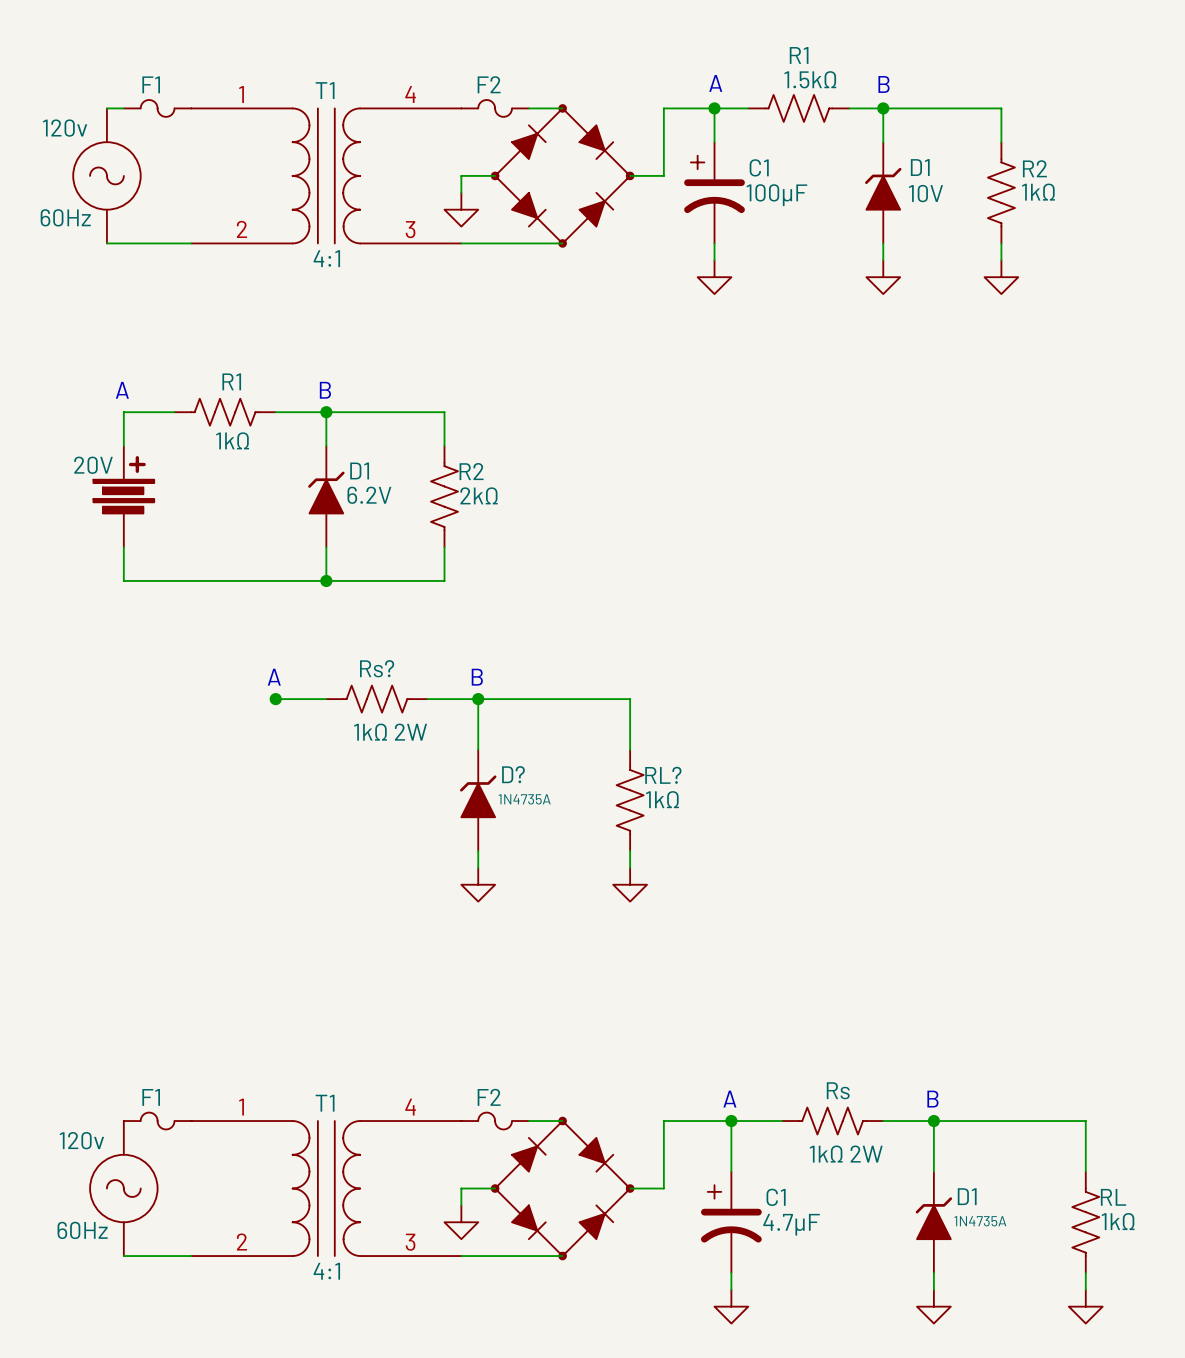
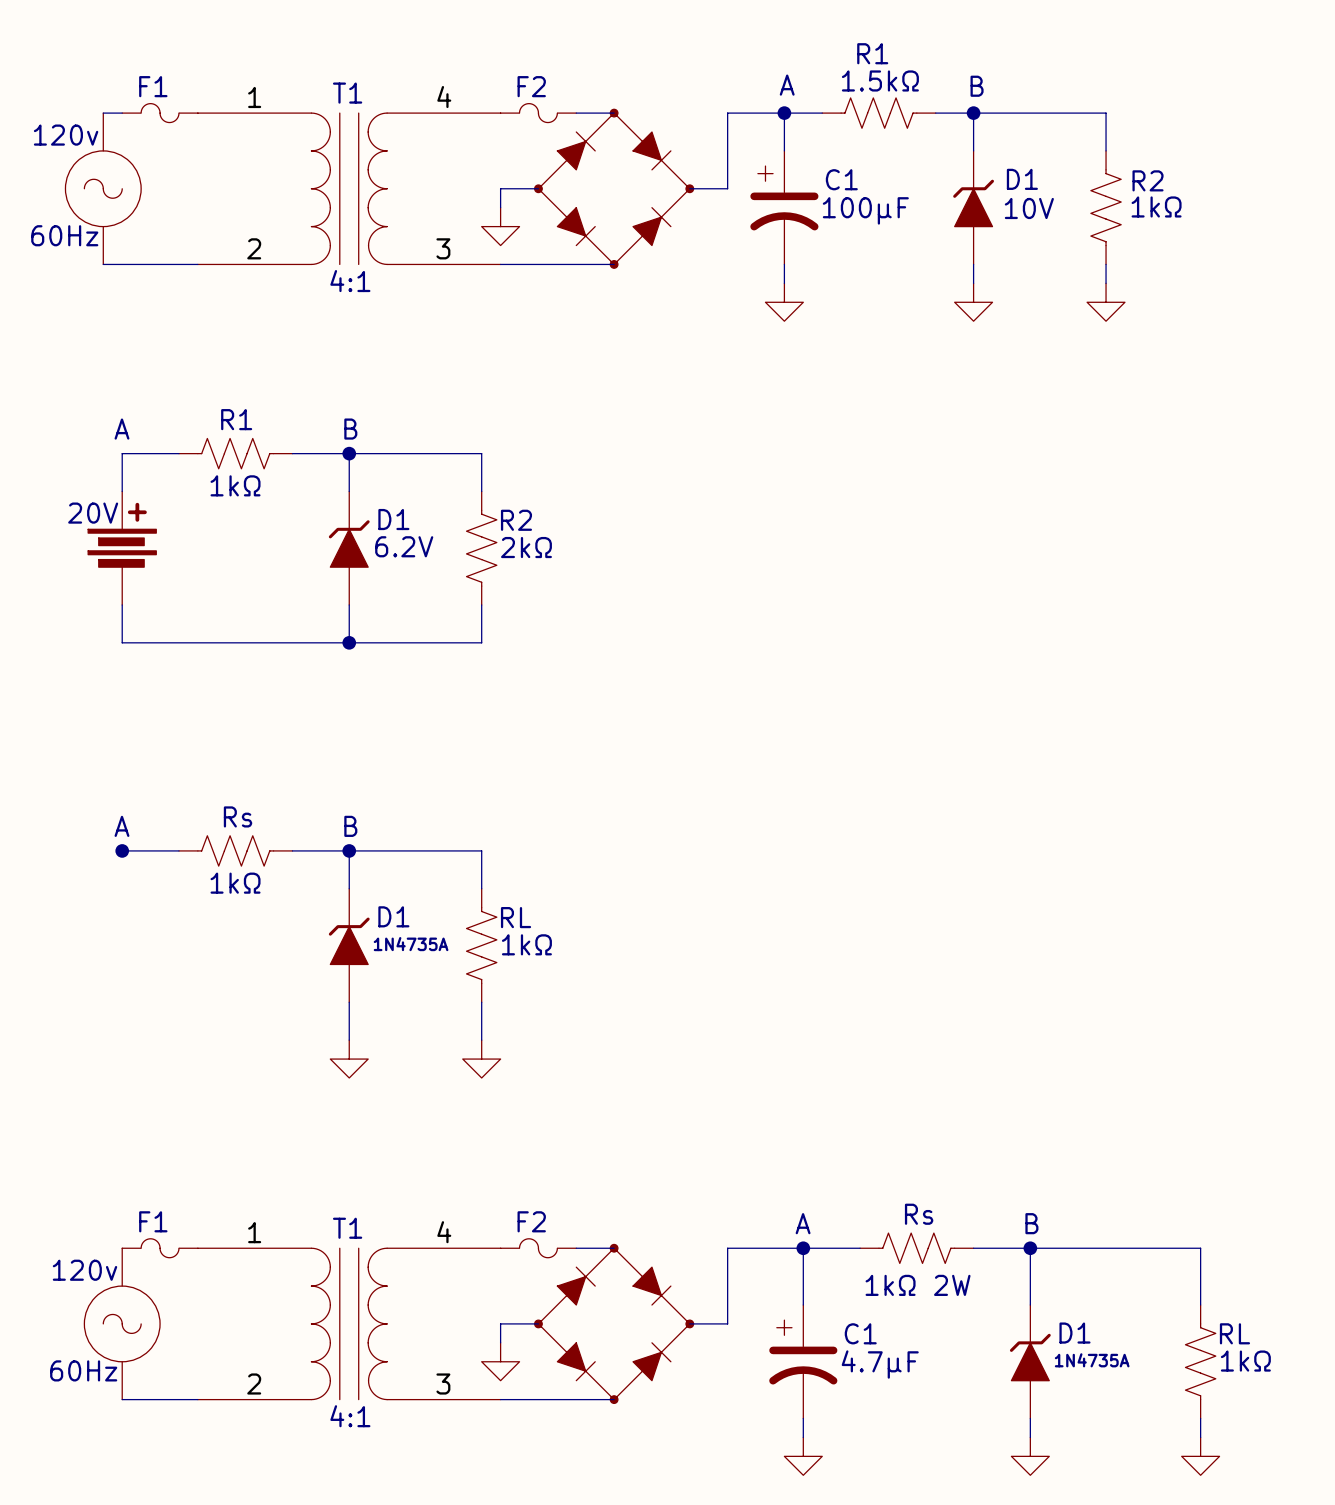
text position: A (274, 677) -> A (121, 826)
text position: B (477, 677) -> B (350, 826)
wire: (275, 699) (326, 699) -> (122, 850) (178, 850)
junction: (275, 699) -> none
Rs?: 1kΩ 2W (376, 699) -> none
wire: (427, 699) (630, 699) (630, 749) -> none
wire: (478, 699) (478, 749) -> none
junction: (478, 699) -> none
junction: none -> (122, 850)
Rs: none -> 1kΩ (235, 850)
wire: none -> (292, 850) (481, 850) (481, 888)
wire: none -> (349, 850) (349, 888)
junction: none -> (349, 850)
D?: 1N4735A (478, 800) -> none
RL?: 1kΩ (630, 800) -> none
D1: none -> 1N4735A (349, 945)
RL: none -> 1kΩ (481, 945)
wire: (478, 850) (478, 867) -> none
wire: (630, 850) (630, 867) -> none
power symbol position: (478, 884) -> (481, 1059)
power symbol: (630, 884) -> none
wire: none -> (349, 1002) (349, 1040)
wire: none -> (481, 1002) (481, 1040)
power symbol: none -> (349, 1059)

